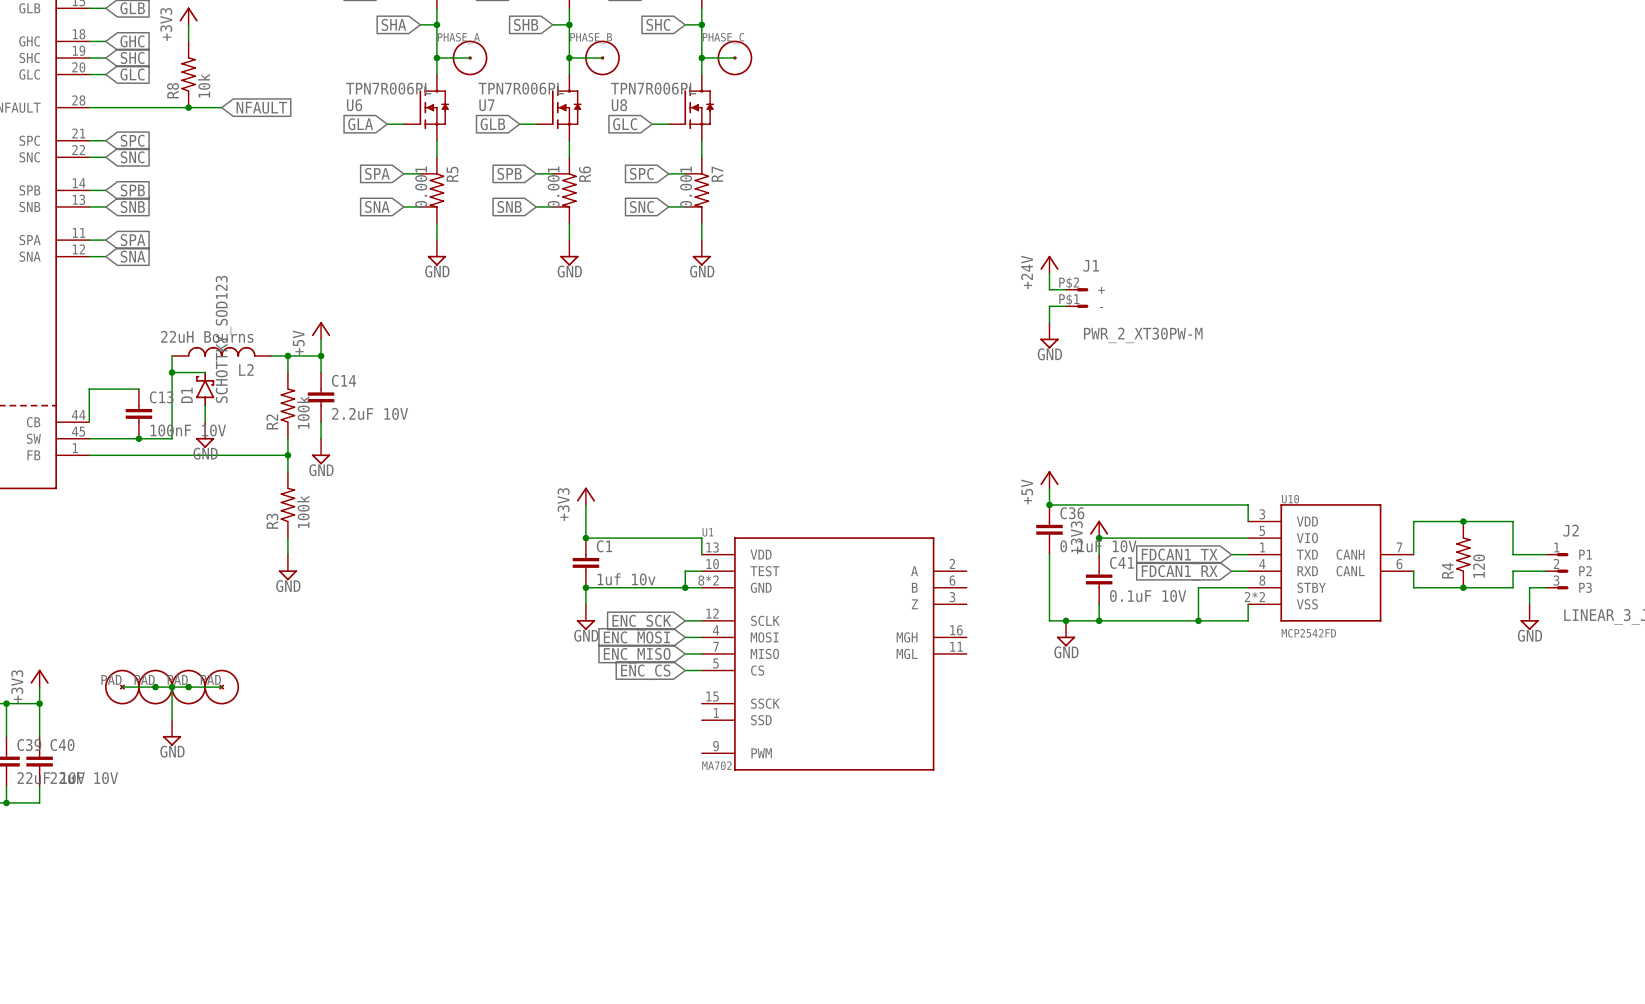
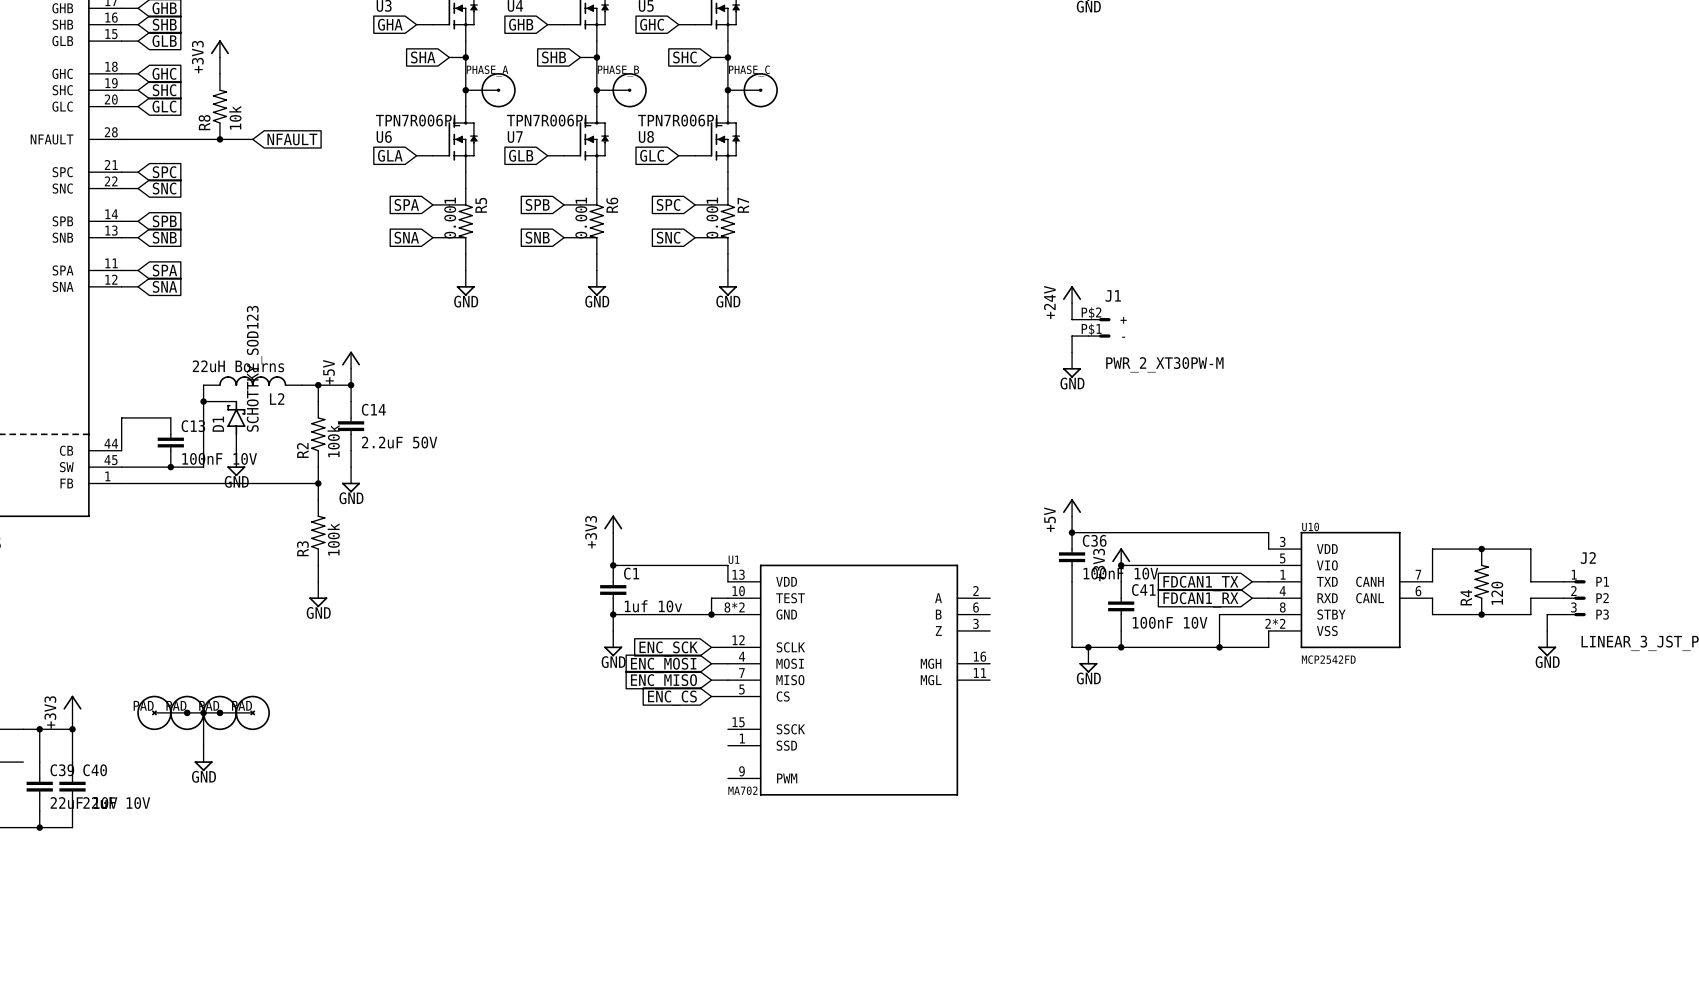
C14 value: 2.2uF 10V (370, 413) -> 2.2uF 50V (399, 442)
C36 value: 0.1uF 10V (1098, 546) -> 100nF 10V (1120, 573)
C41 value: 0.1uF 10V (1148, 596) -> 100nF 10V (1170, 622)

